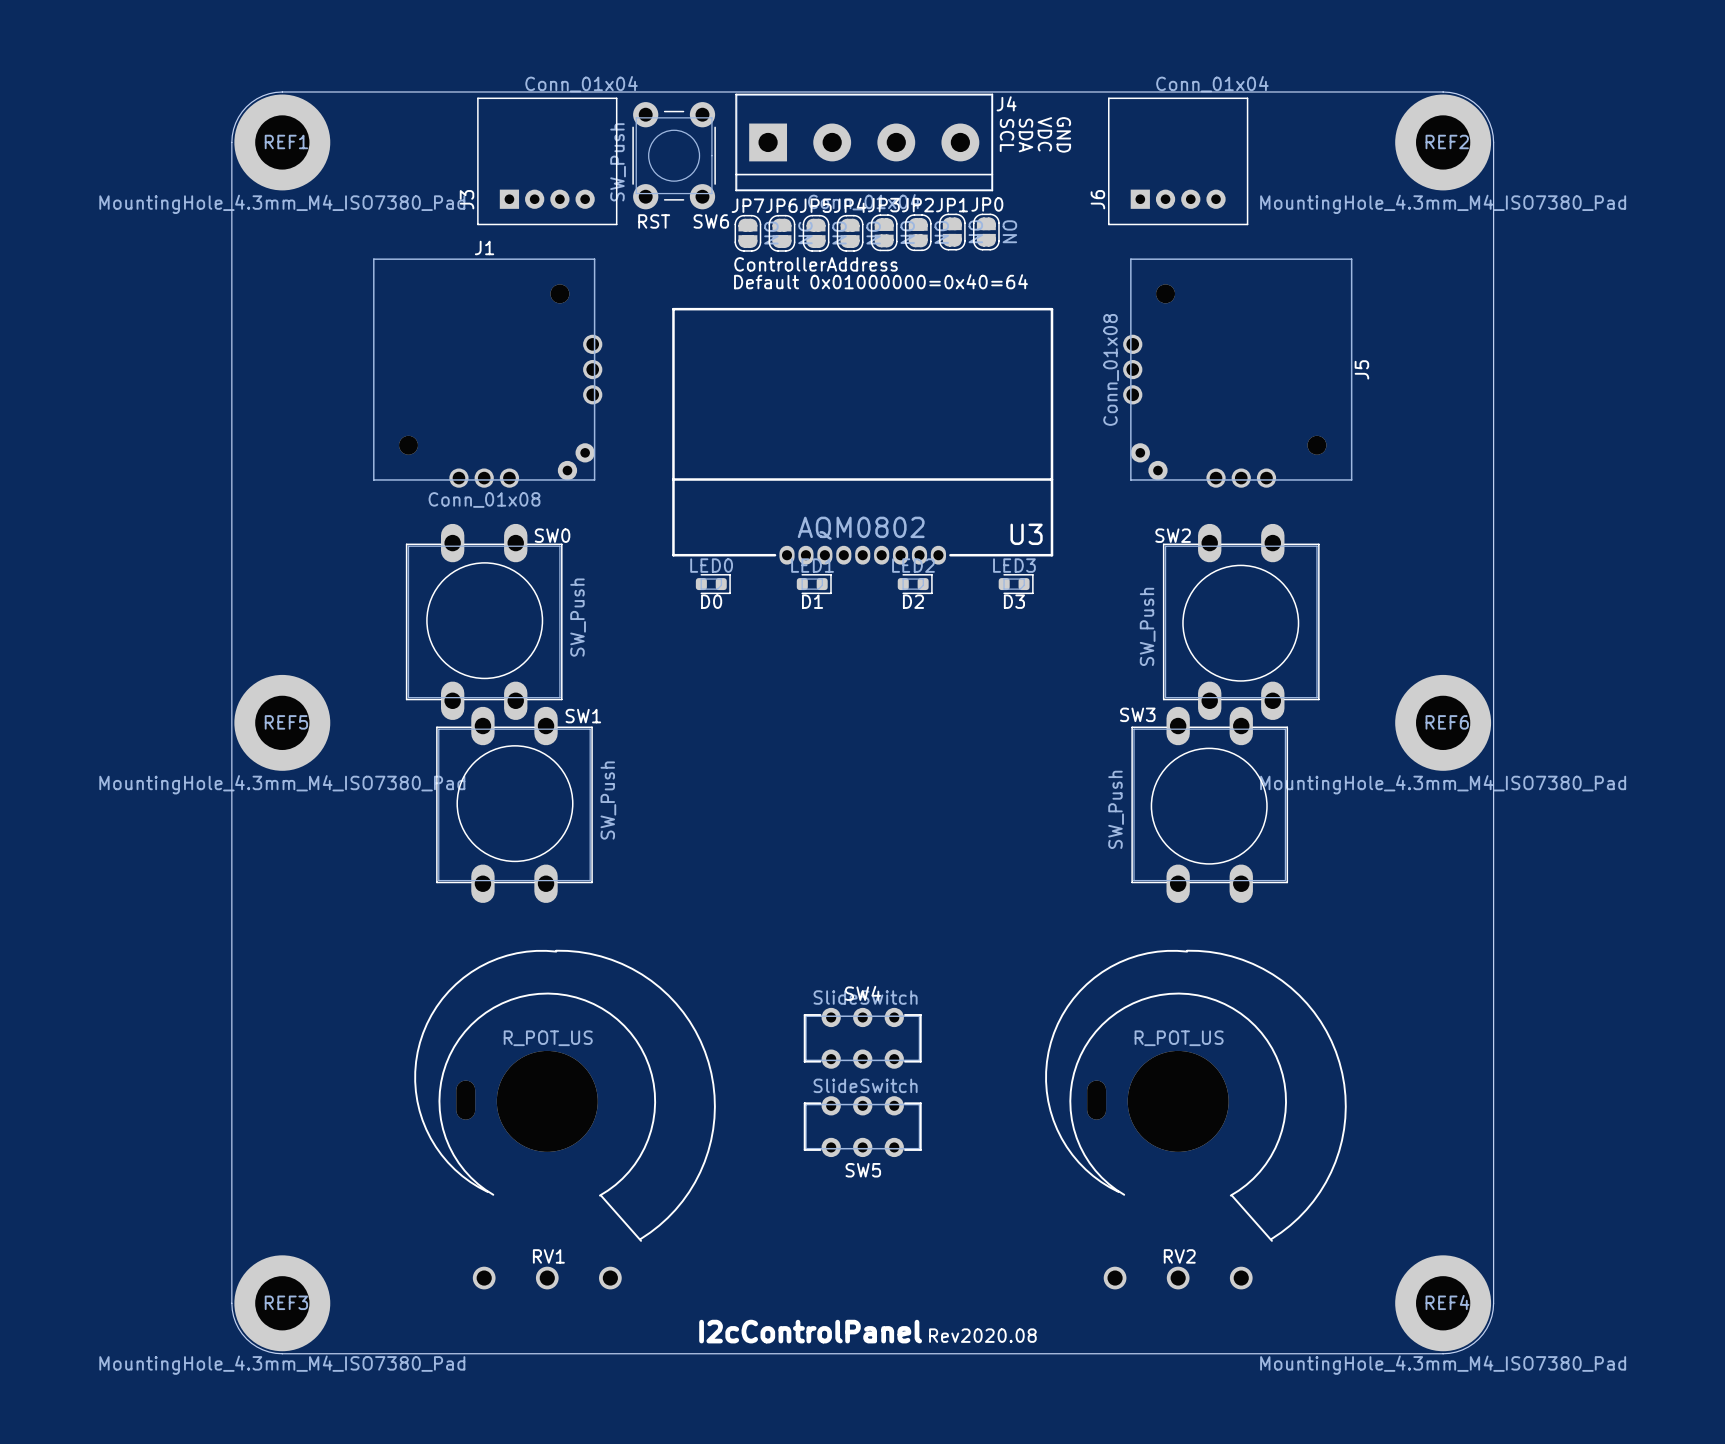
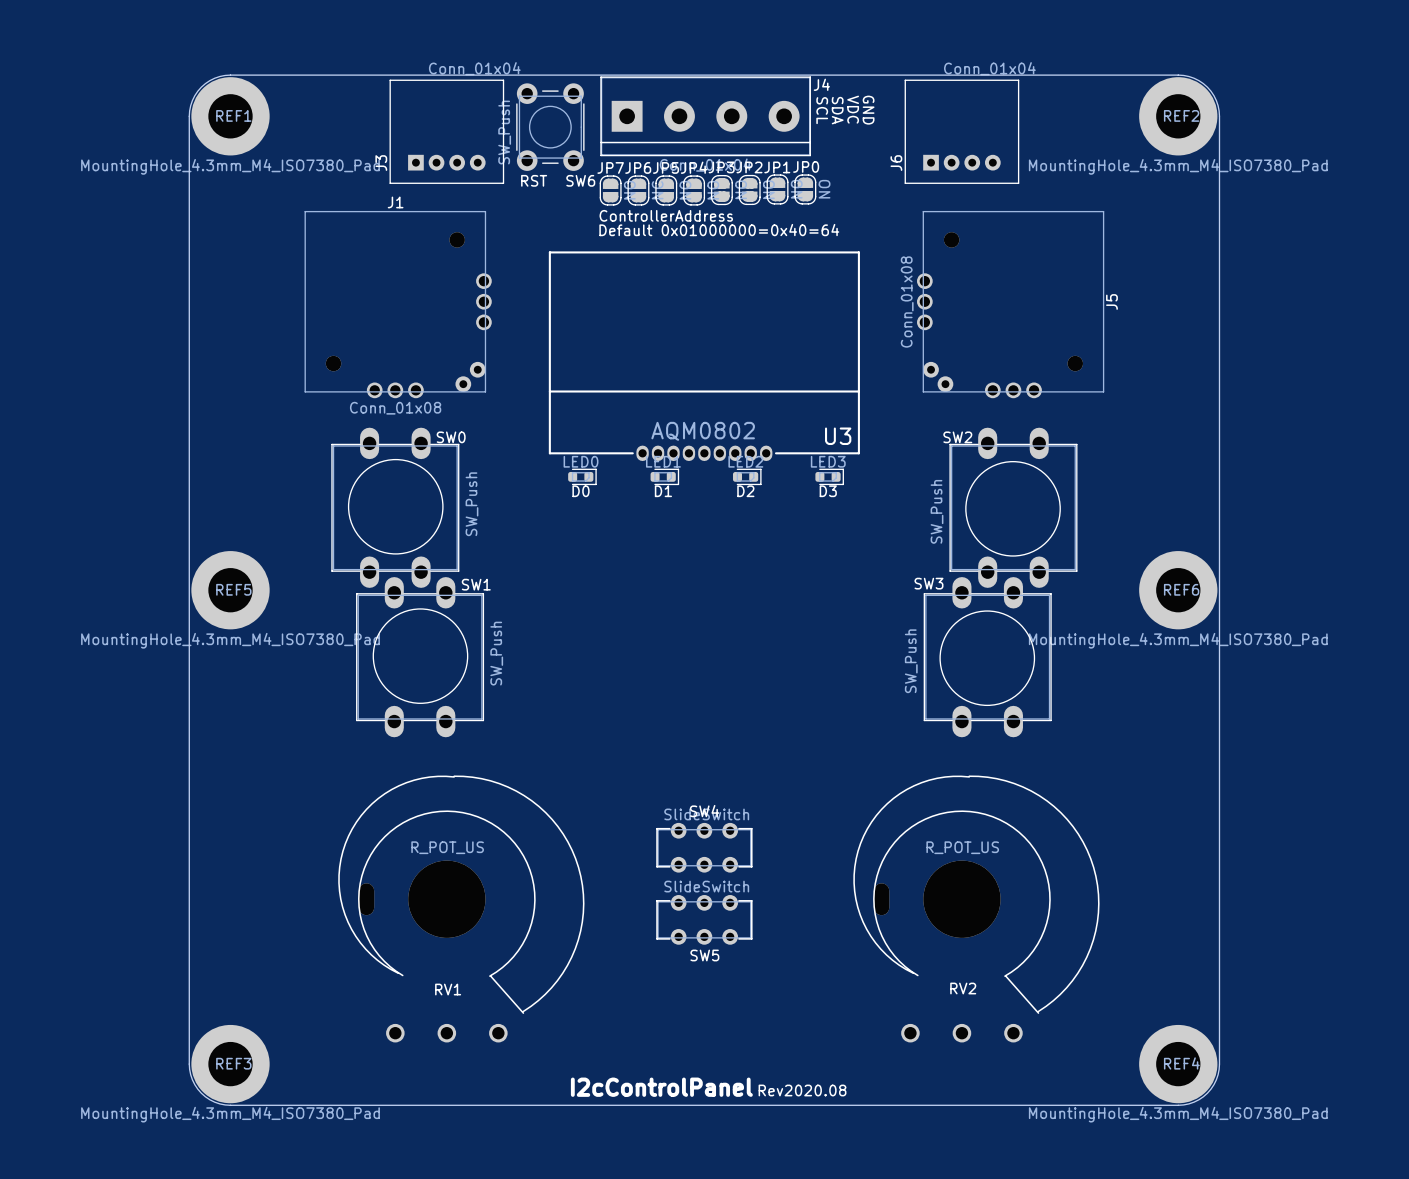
RV1 footprint: [414, 949, 716, 1290] -> [338, 775, 585, 1043]
RV2 footprint: [1045, 949, 1347, 1290] -> [853, 775, 1100, 1043]
RV1 name position: RV1 (548, 1256) -> RV1 (448, 989)
RV2 name position: RV2 (1179, 1256) -> RV2 (963, 988)

